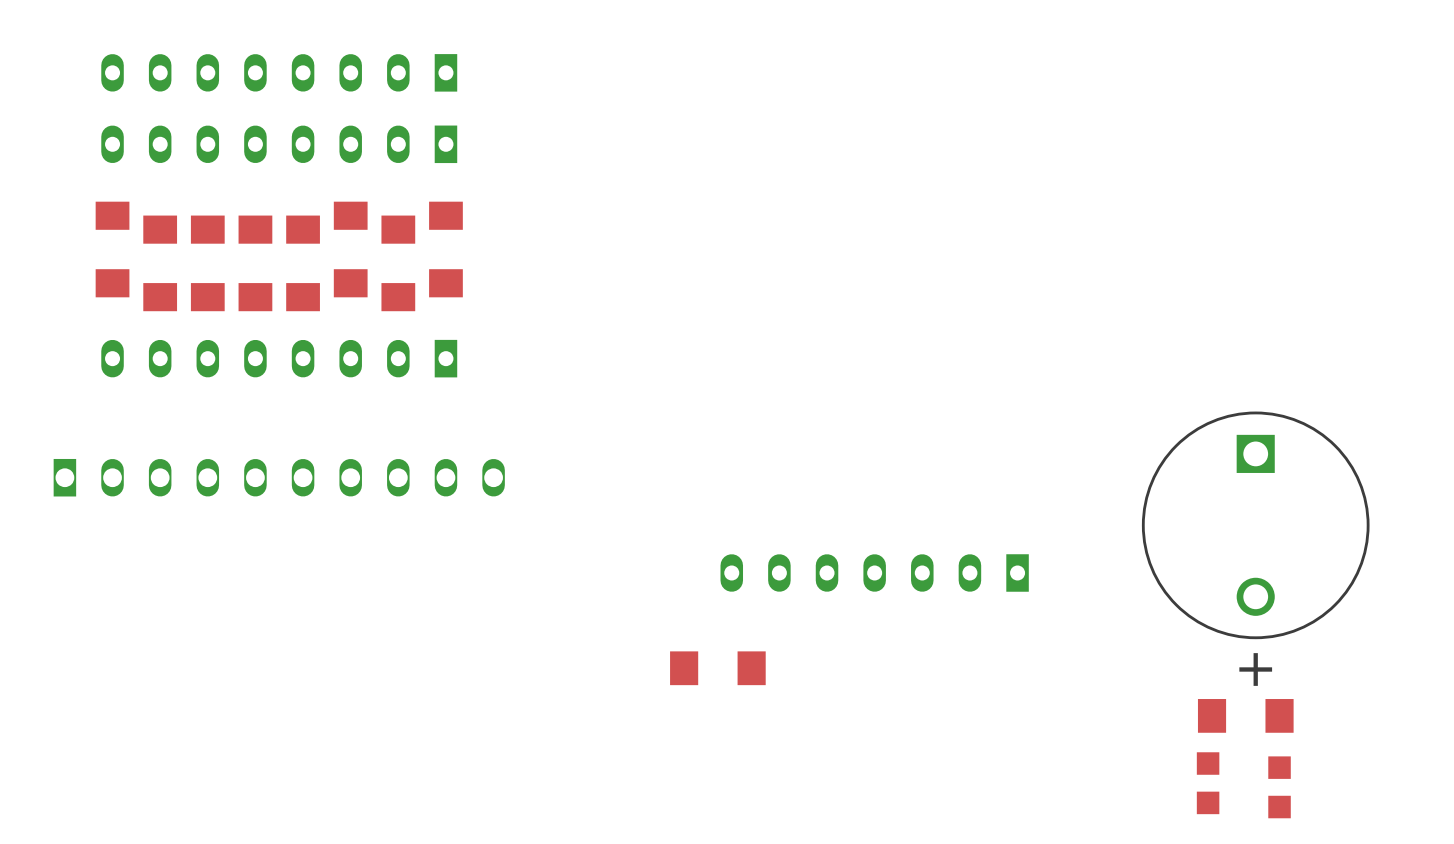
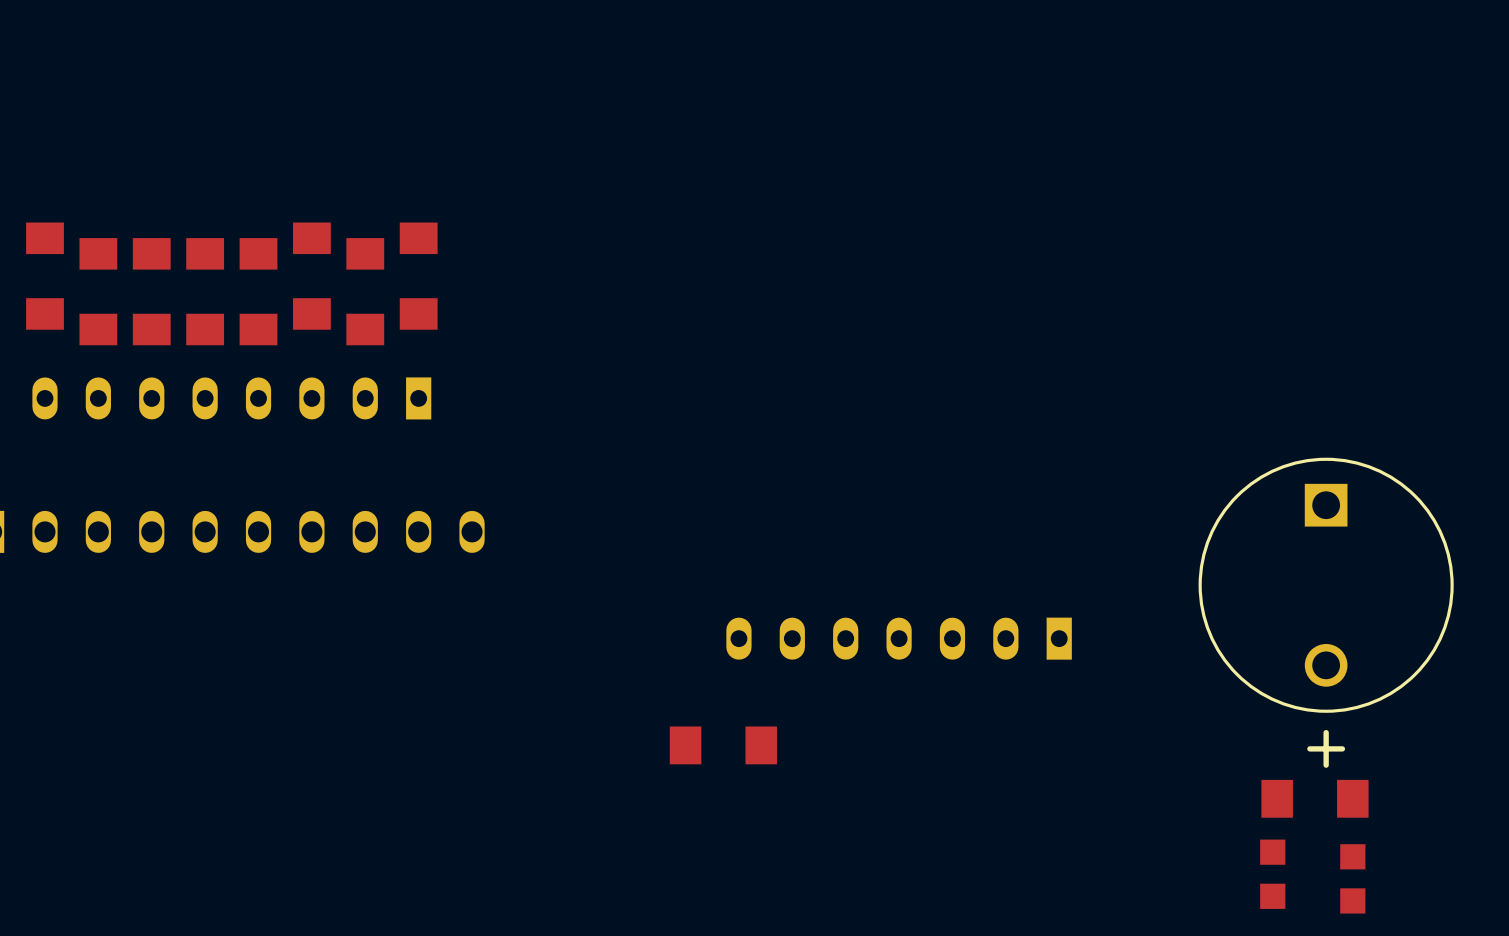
part: (279, 72) -> none
part: (279, 144) -> none

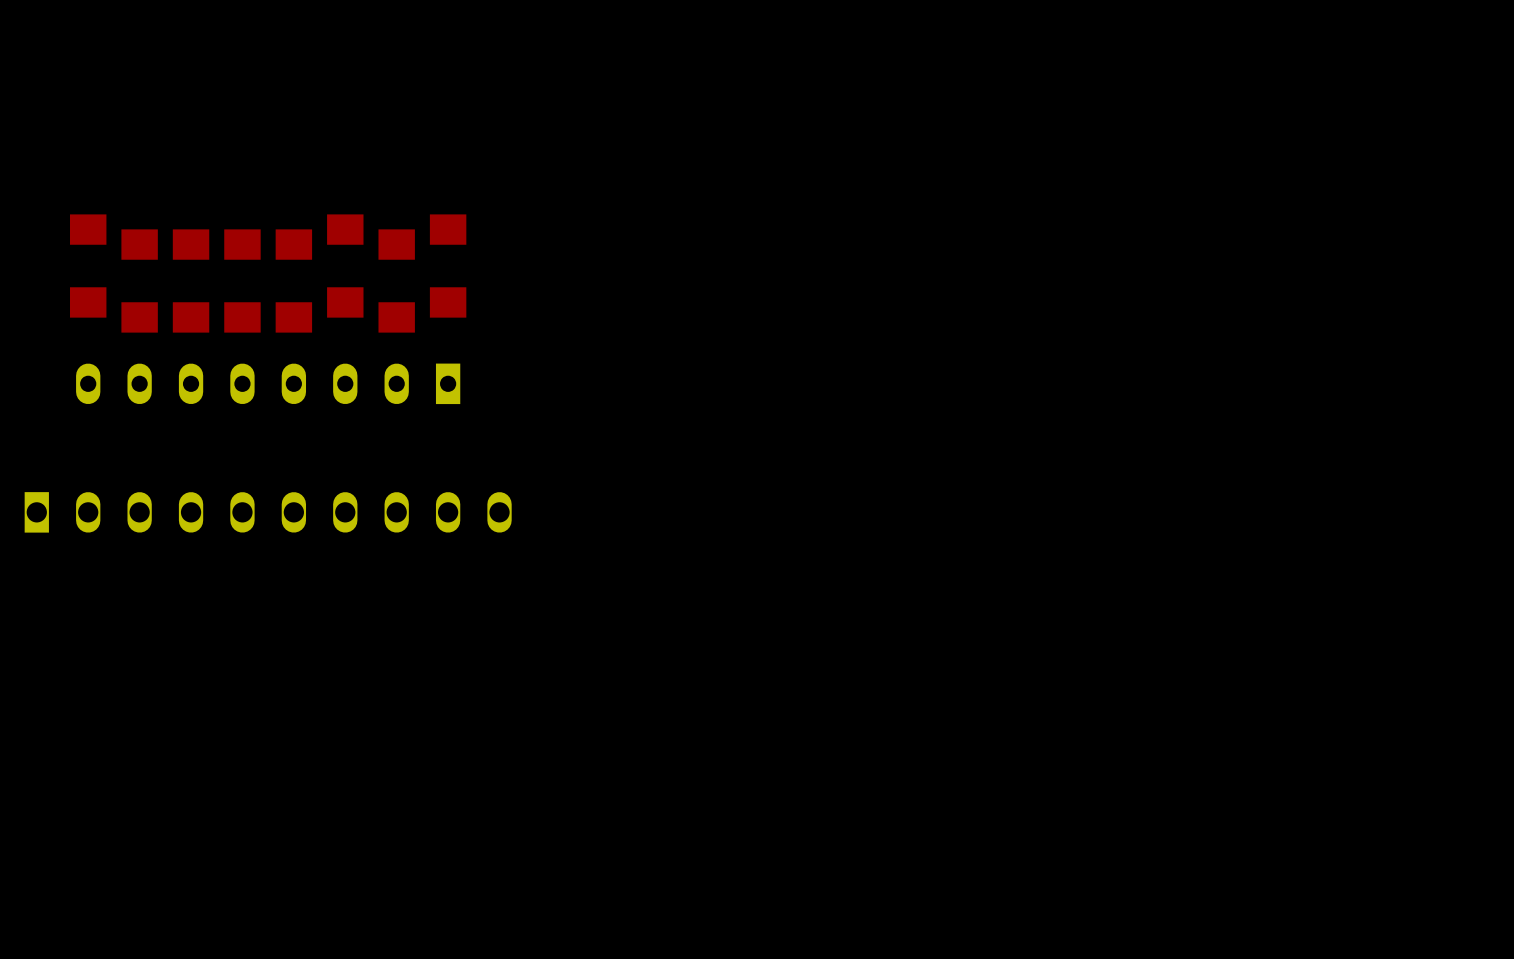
part: (1326, 585) -> none
part: (899, 638) -> none
part: (723, 745) -> none
part: (1315, 798) -> none
part: (1272, 874) -> none
part: (1352, 878) -> none

